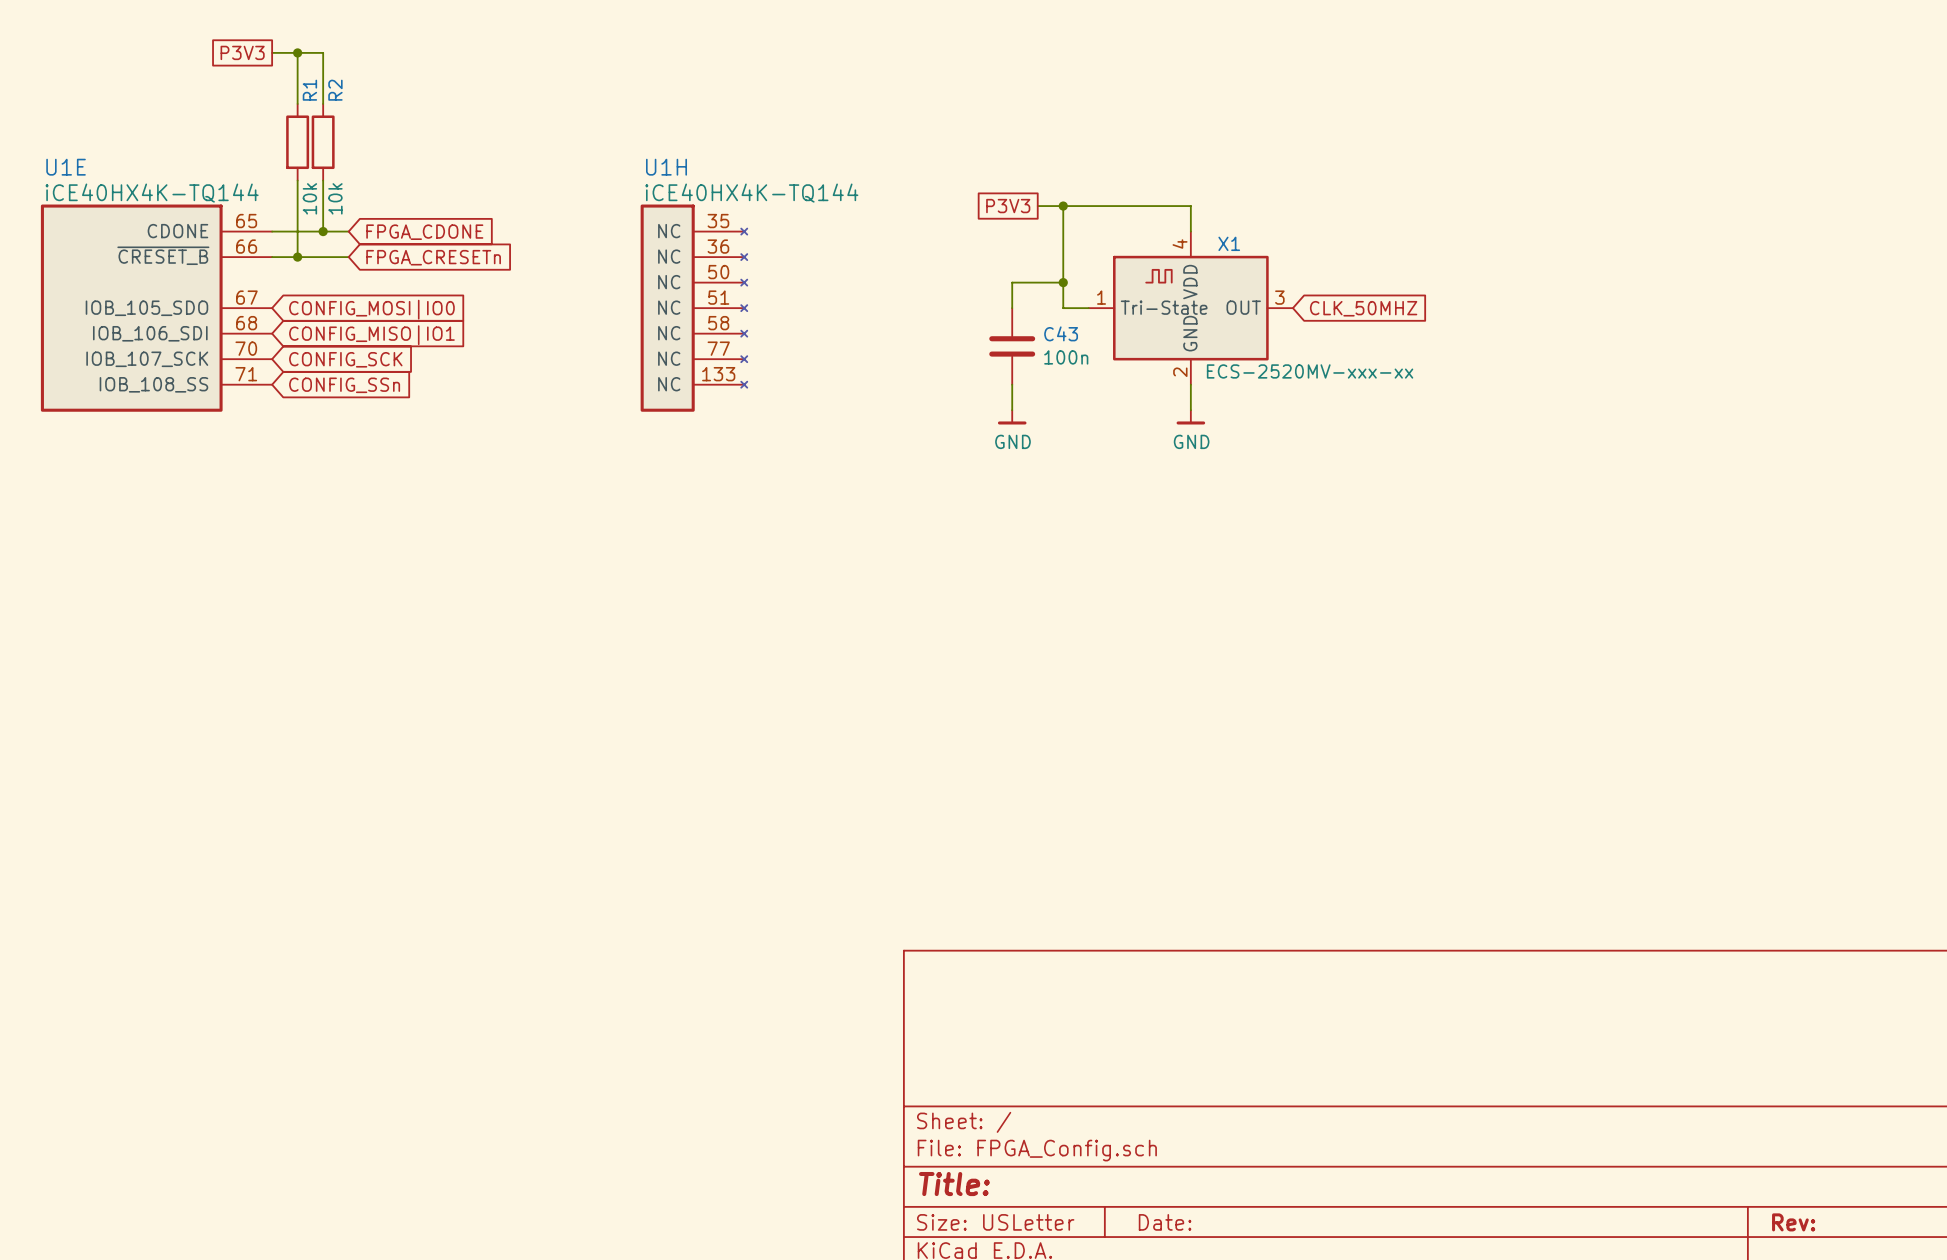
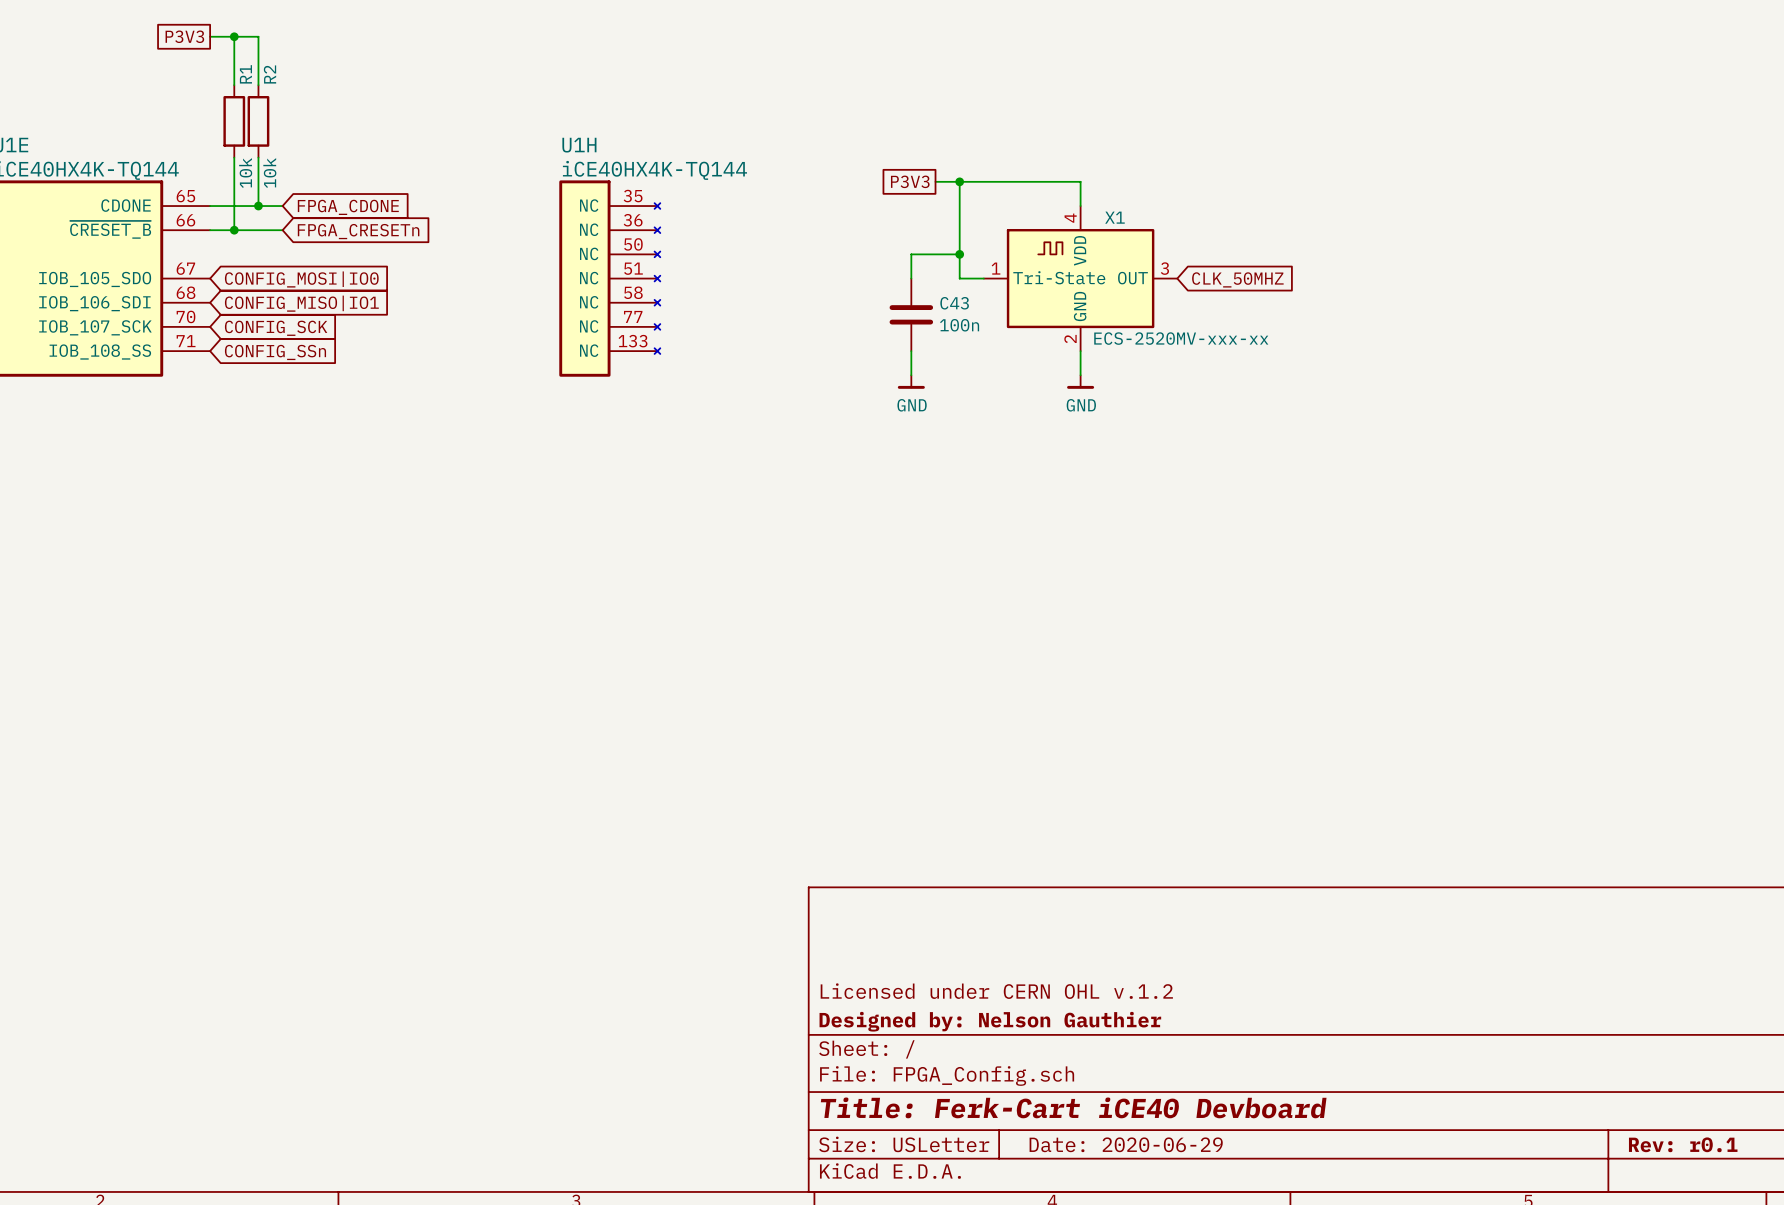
title block: none -> Licensed under CERN OHL v.1.2 (996, 991)
title block: none -> Designed by: Nelson Gauthier (990, 1021)
title block: Title: (954, 1184) -> Title: Ferk-Cart iCE40 Devboard (1073, 1107)
title block: Date: (1165, 1222) -> Date: 2020-06-29 (1126, 1144)
title block: Rev: (1793, 1222) -> Rev: r0.1 (1683, 1144)

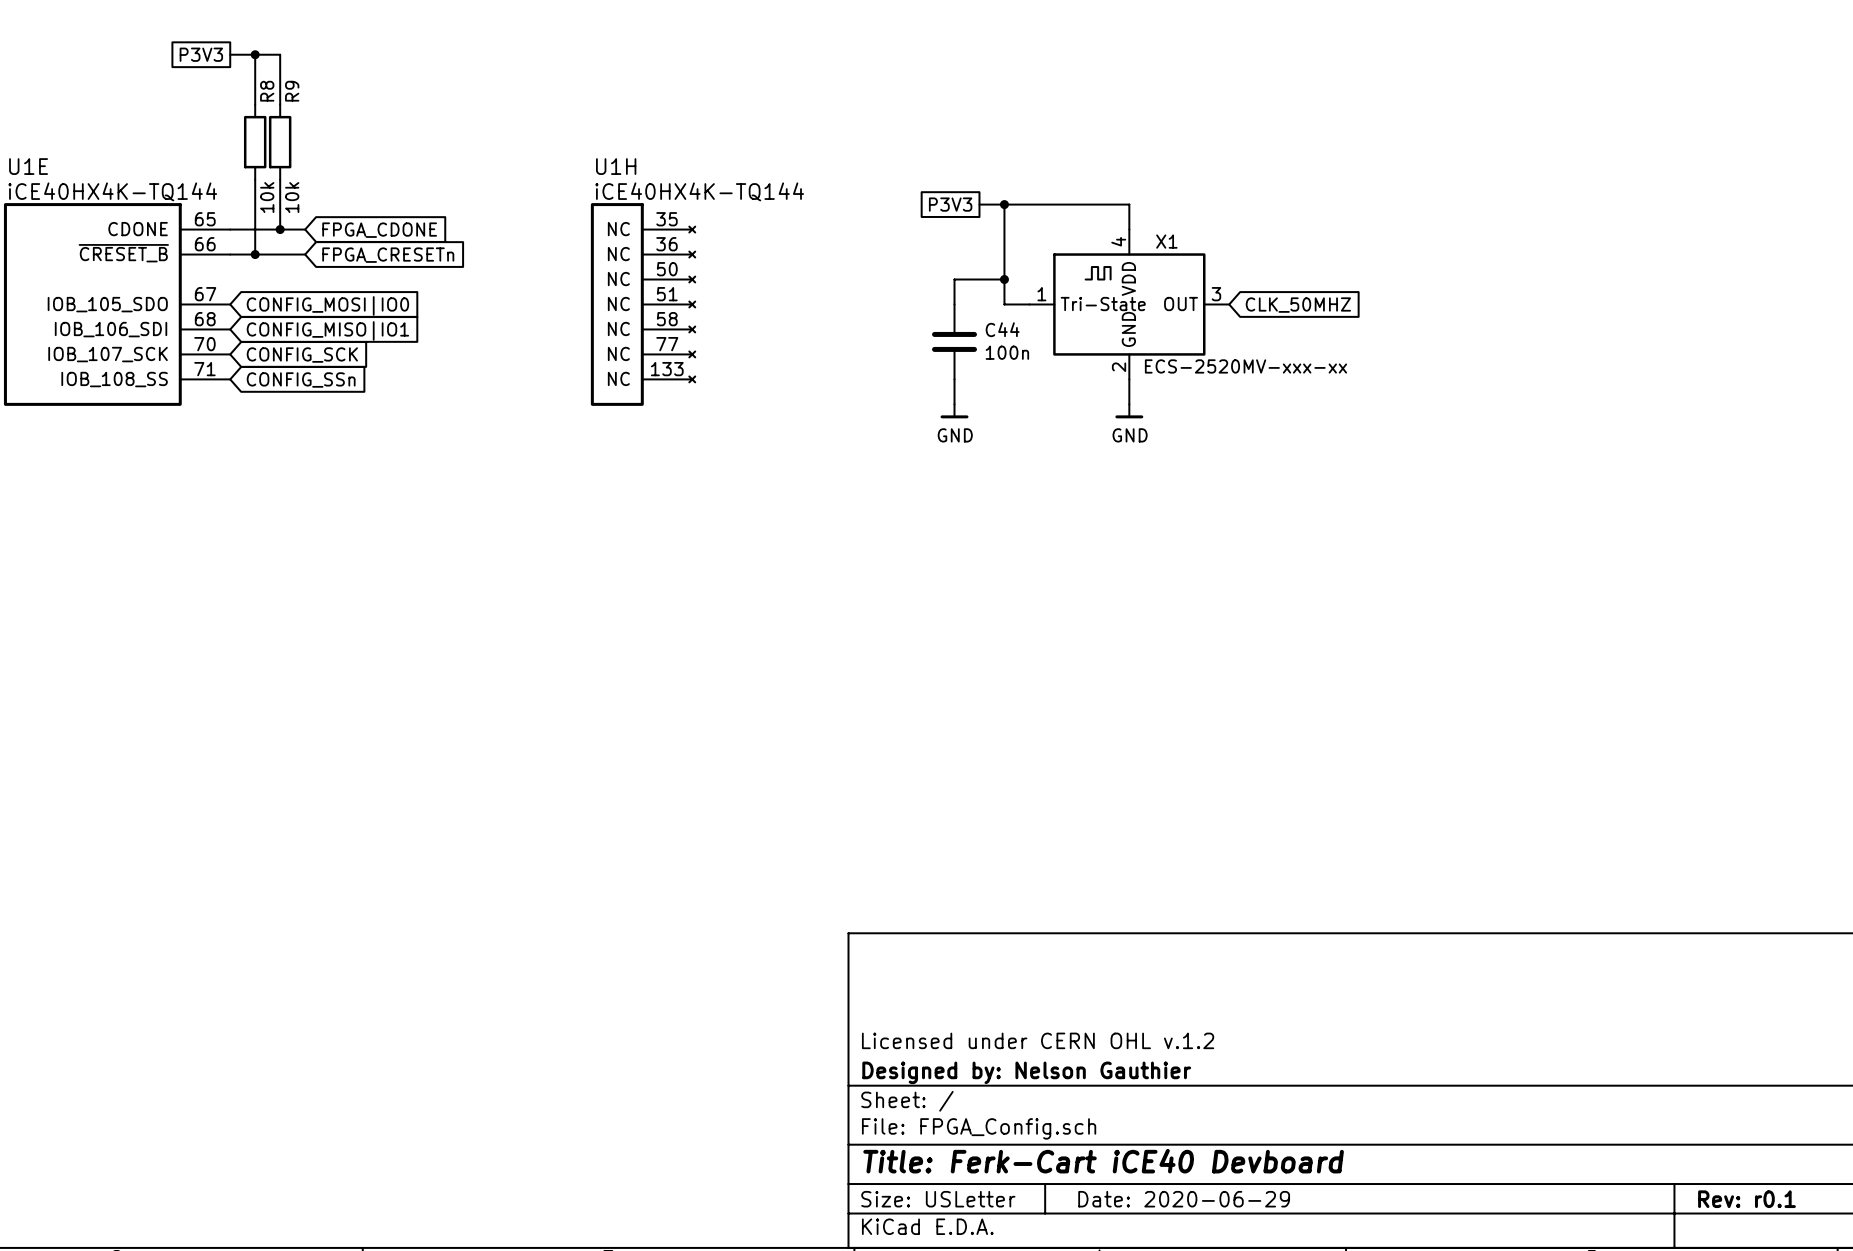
R1 name: R1 (245, 74) -> R8 (267, 91)
R2 name: R2 (270, 74) -> R9 (292, 91)
C43 name: C43 (954, 303) -> C44 (1002, 329)

